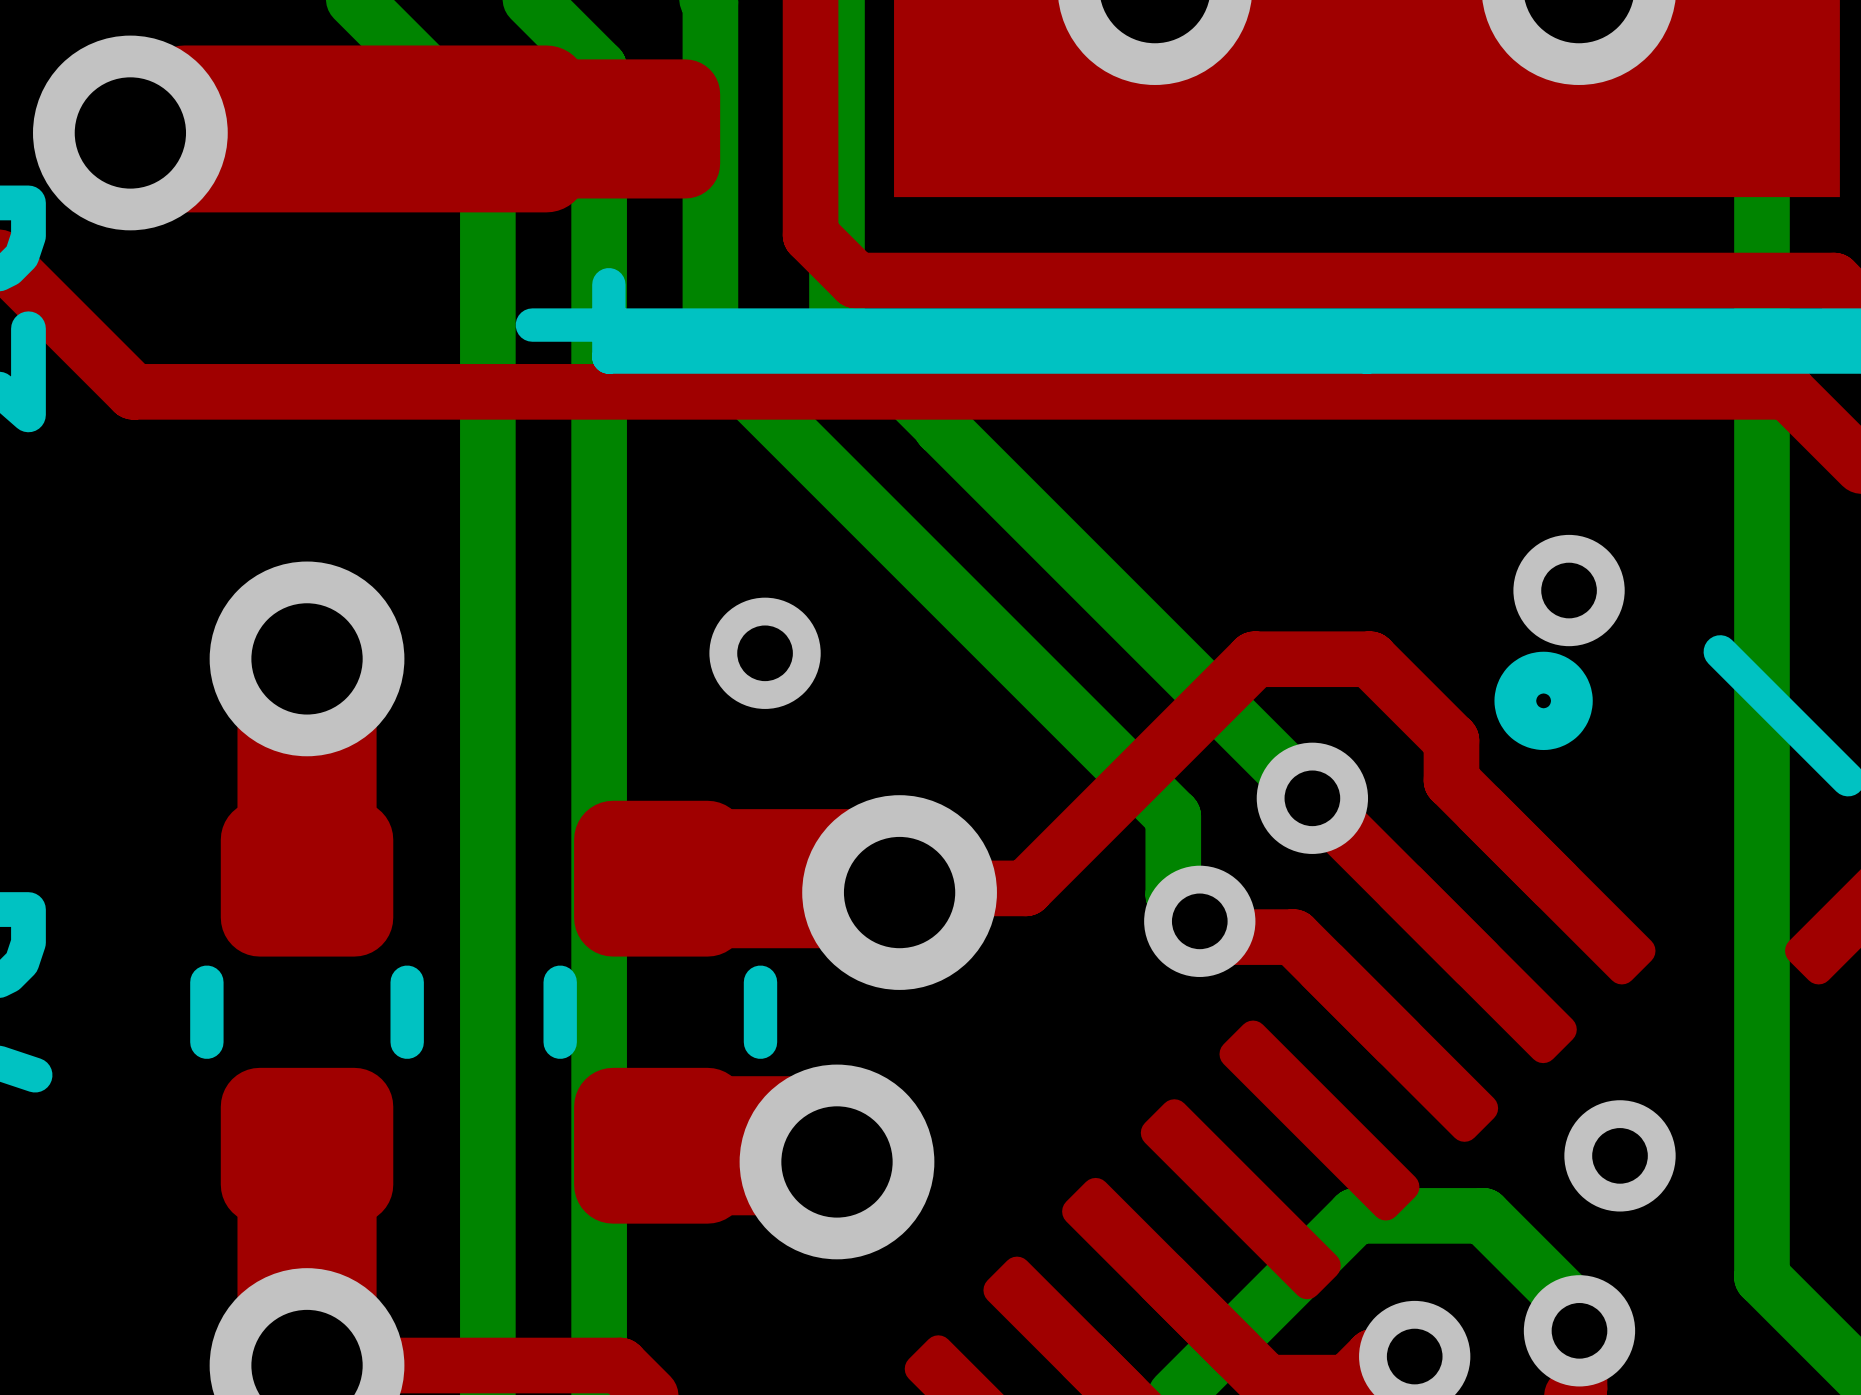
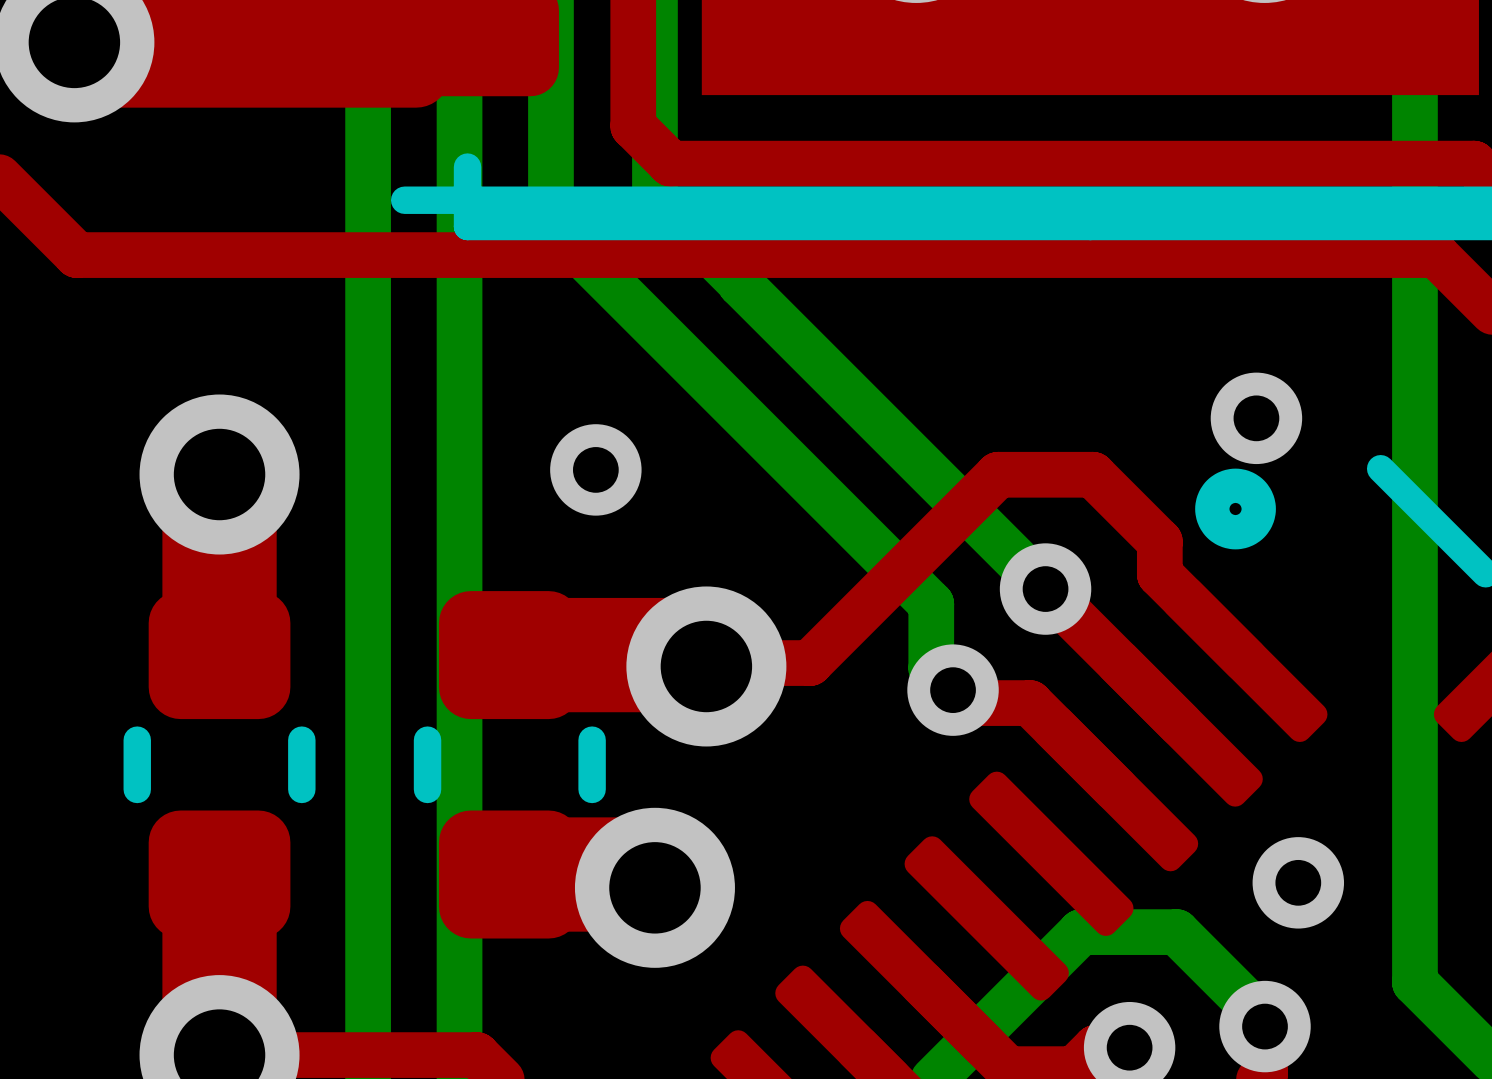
bottom track: (1471, 1215) (1483, 1215) (1579, 1312) (1579, 1330) -> (1176, 932) (1259, 1015)

